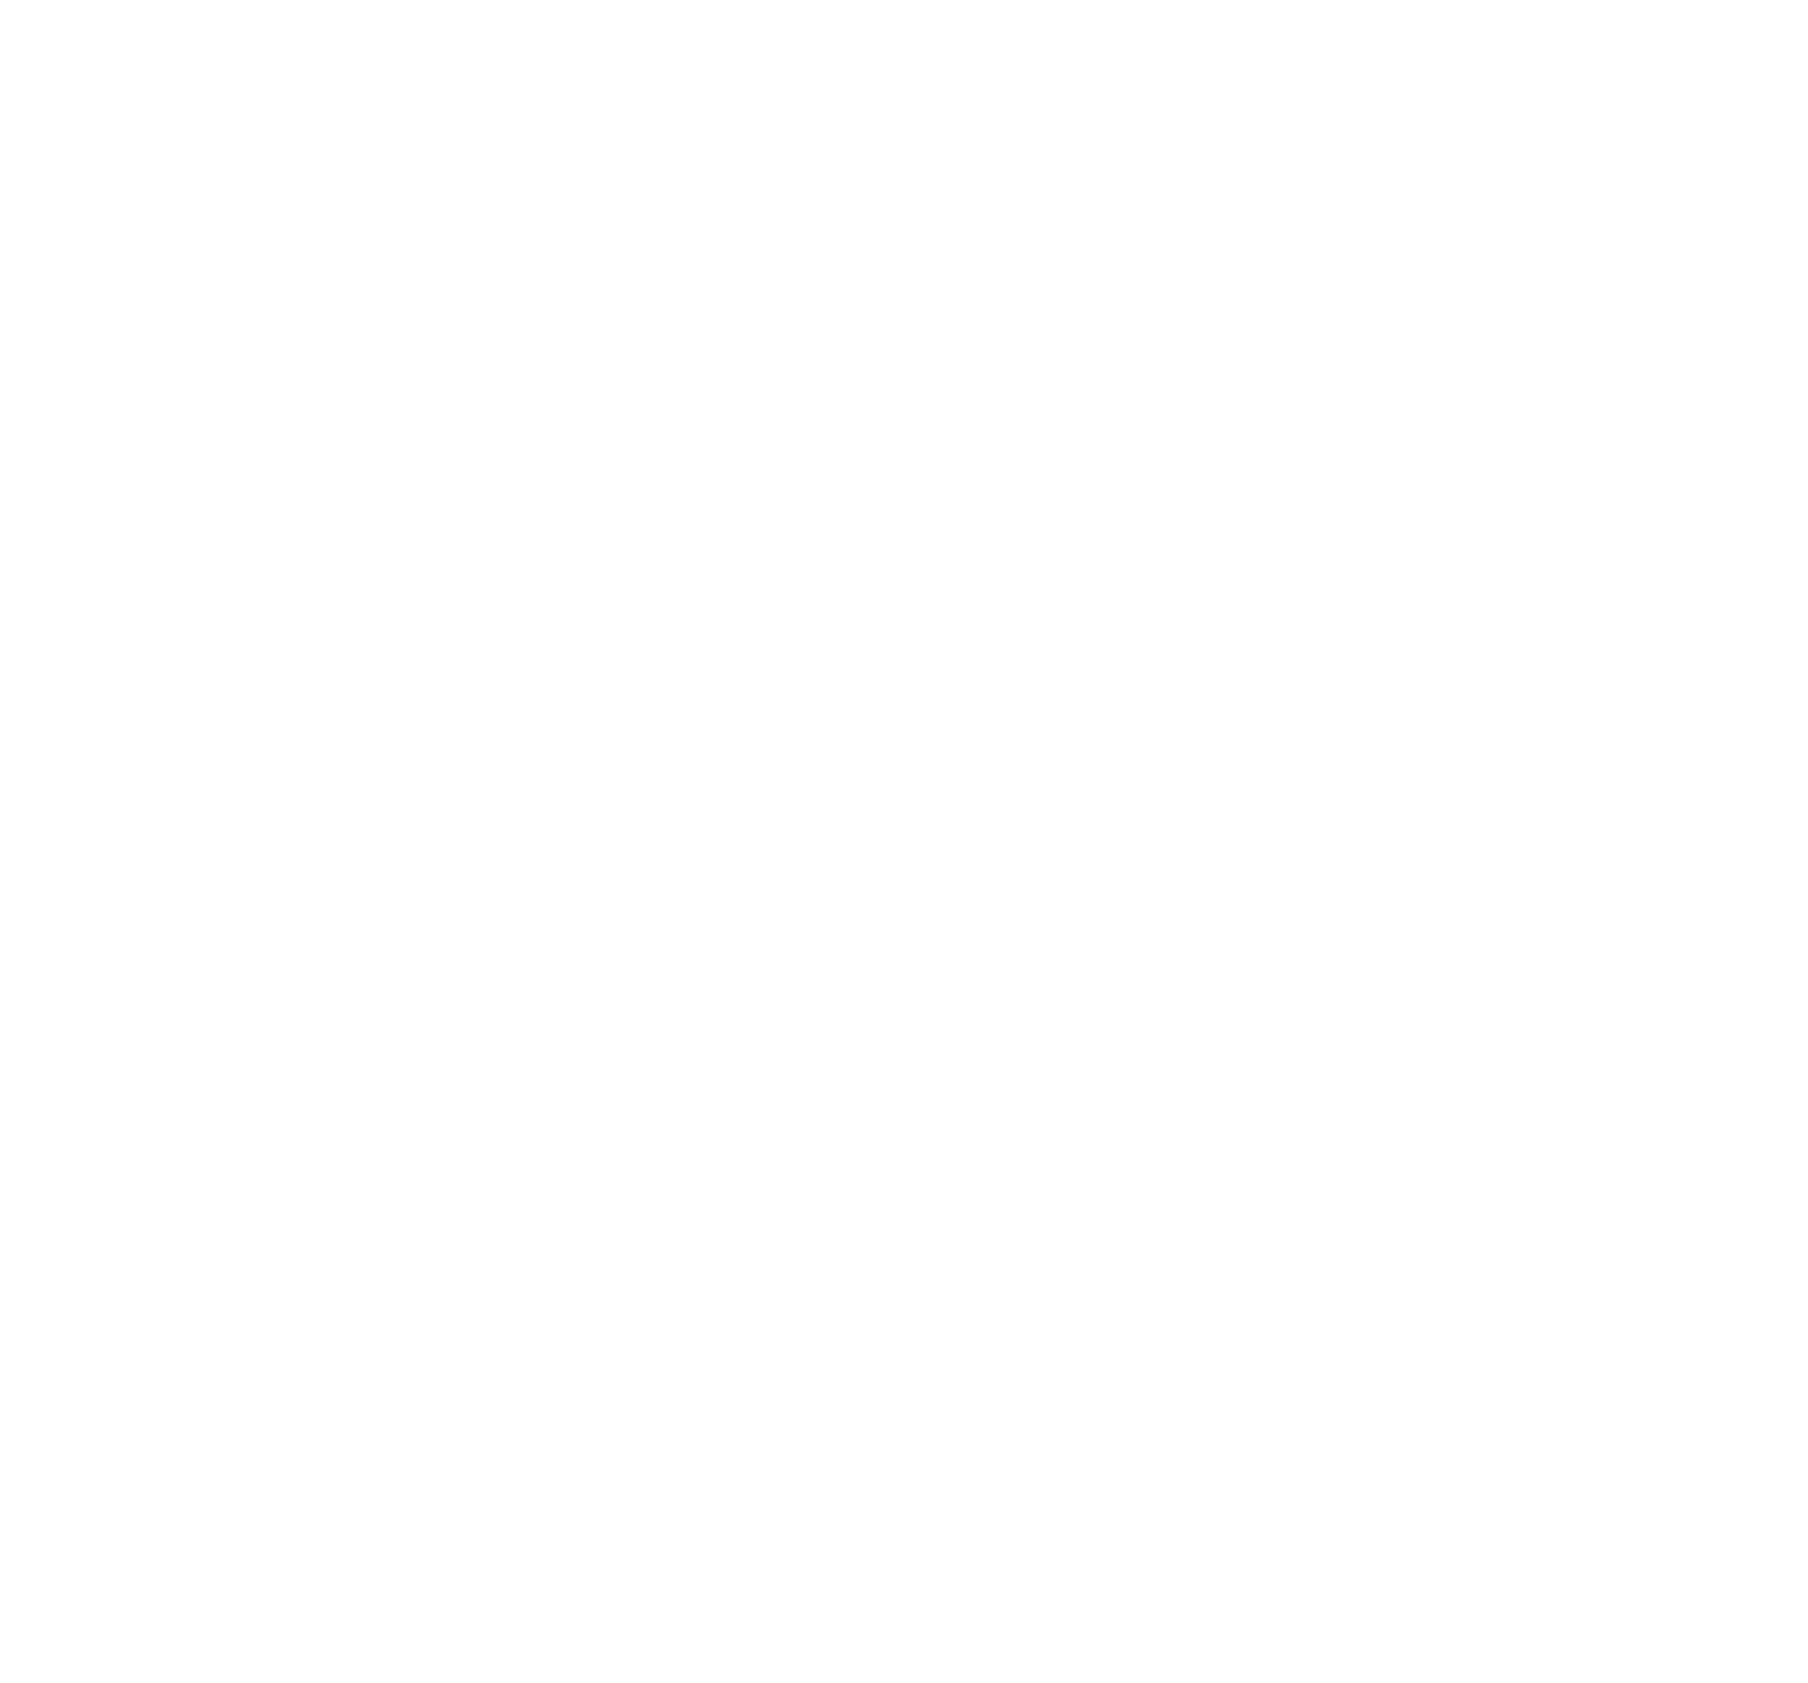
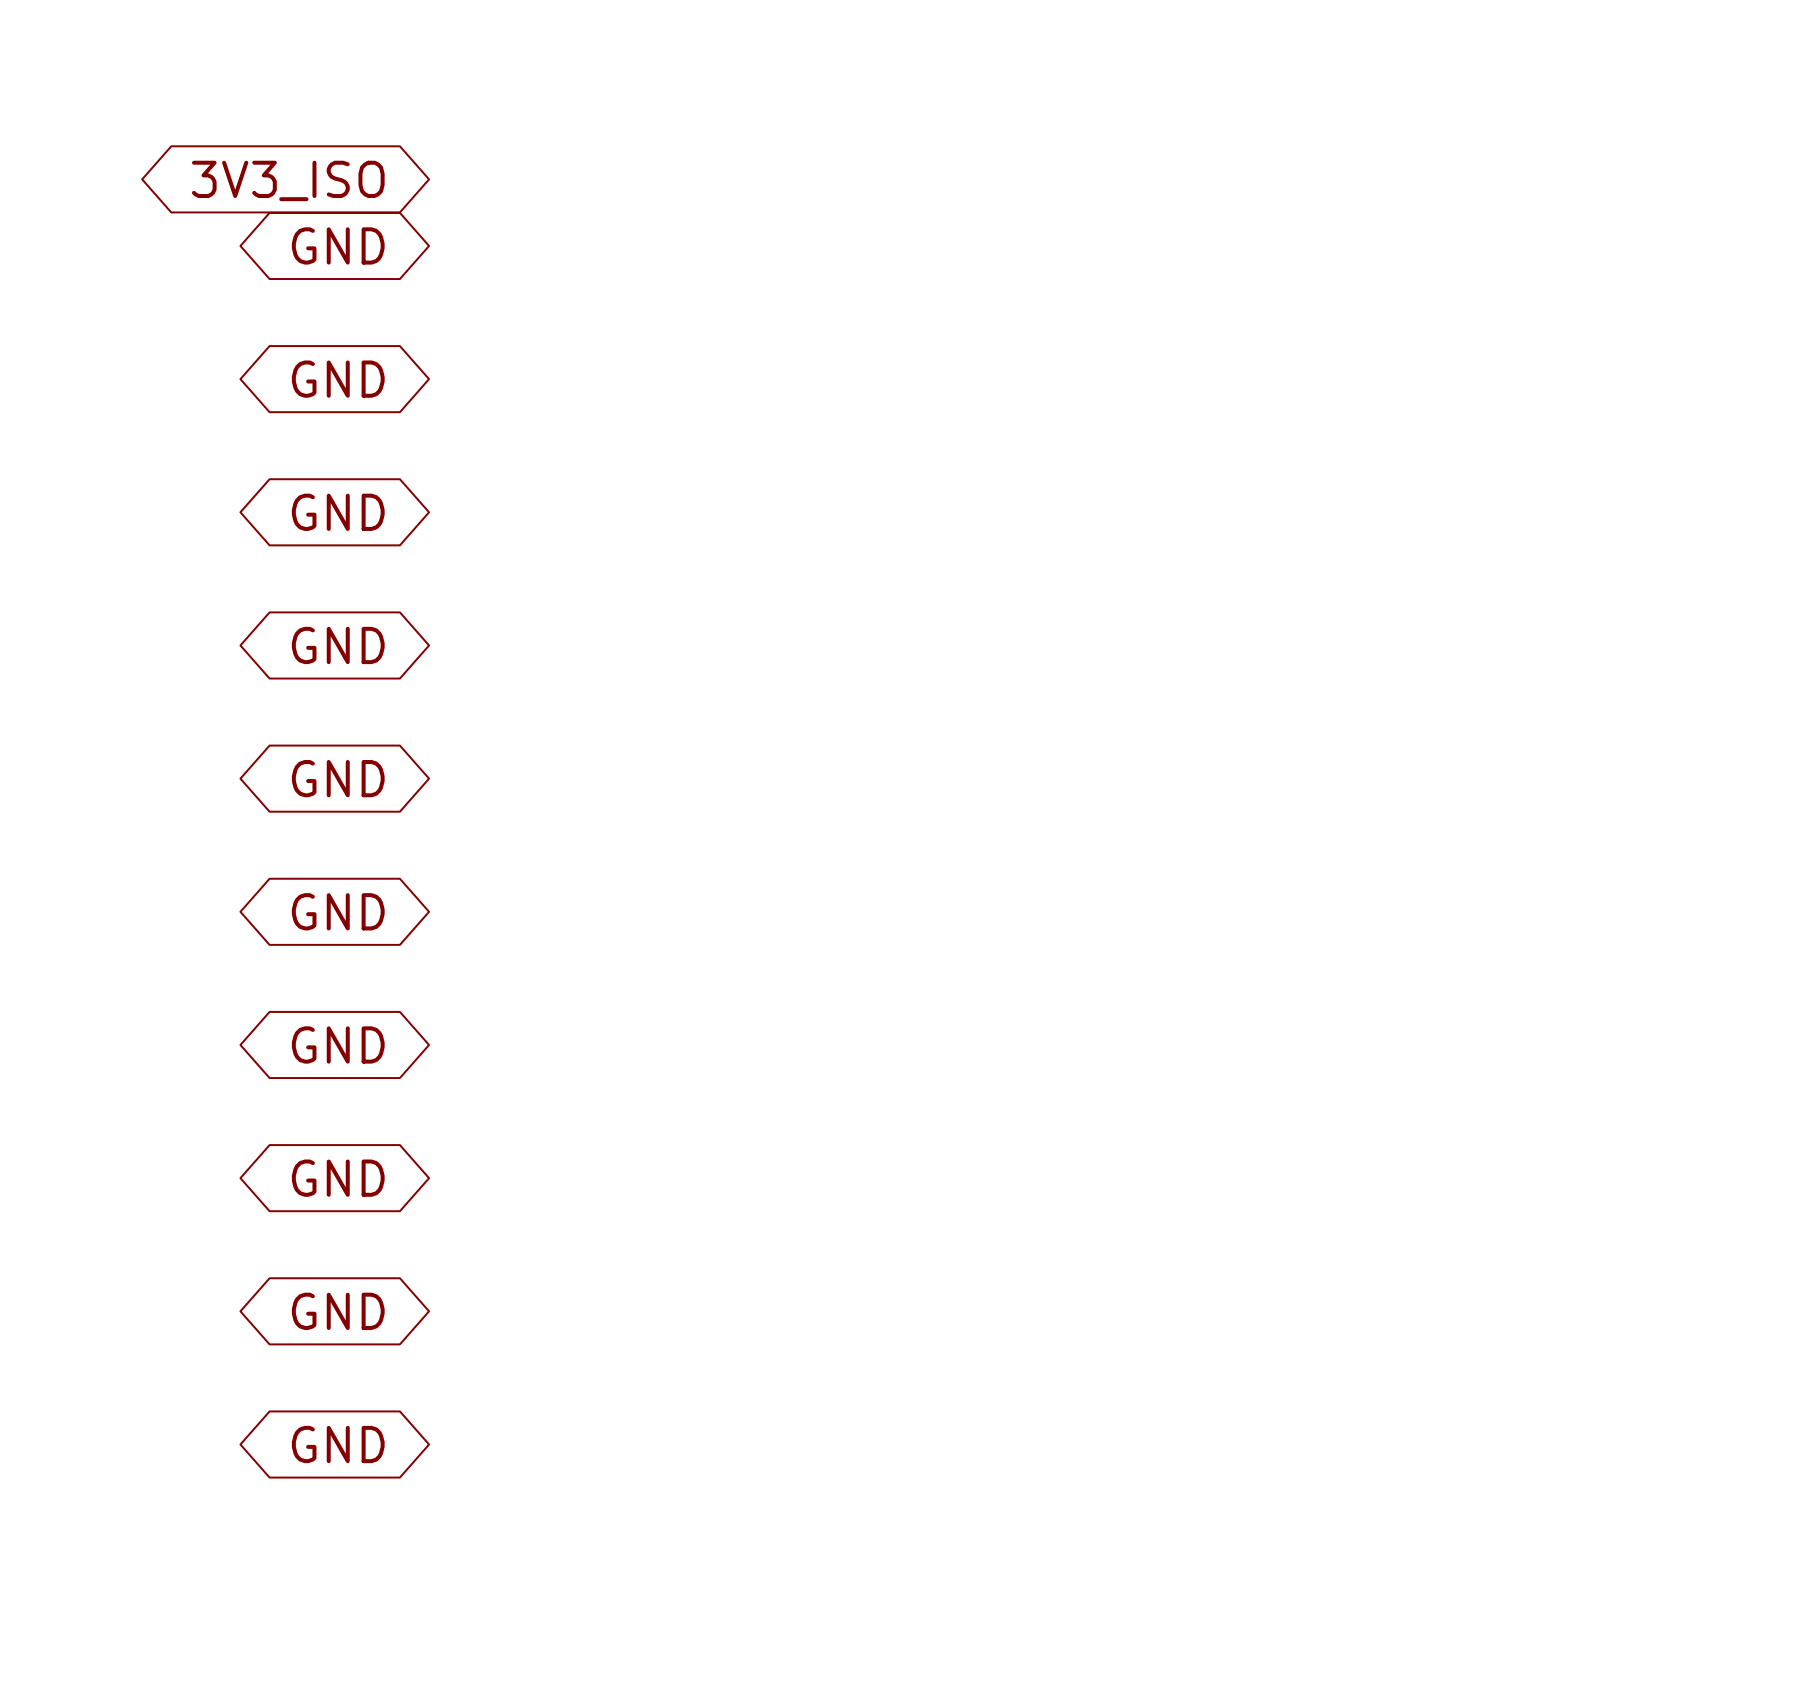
global label: none -> 3V3_ISO (288, 180)
global label: none -> GND (338, 245)
global label: none -> GND (338, 379)
global label: none -> GND (338, 512)
global label: none -> GND (338, 645)
global label: none -> GND (338, 778)
global label: none -> GND (338, 911)
global label: none -> GND (338, 1044)
global label: none -> GND (338, 1178)
global label: none -> GND (338, 1311)
global label: none -> GND (338, 1444)

